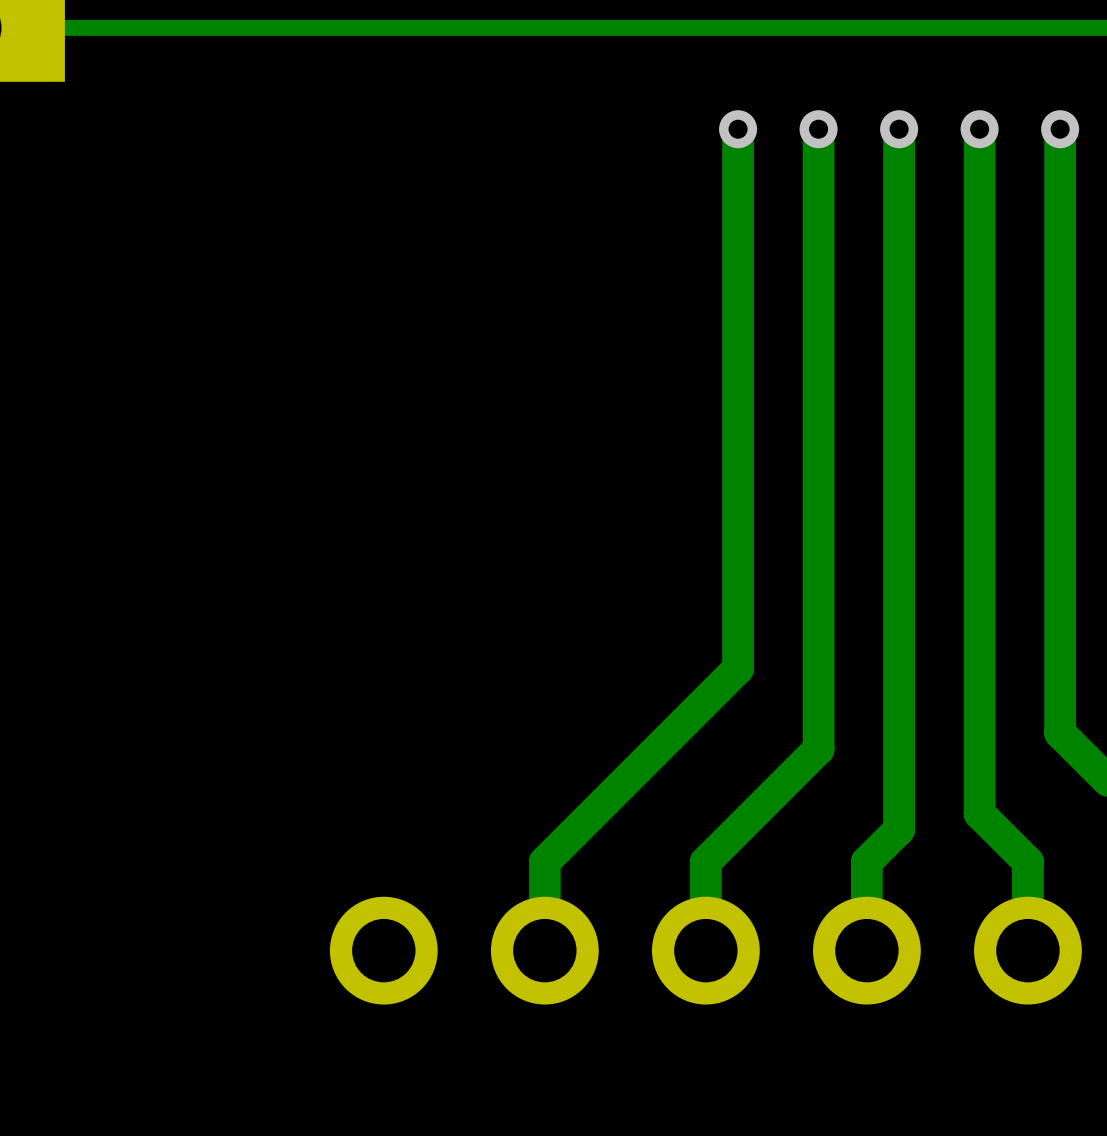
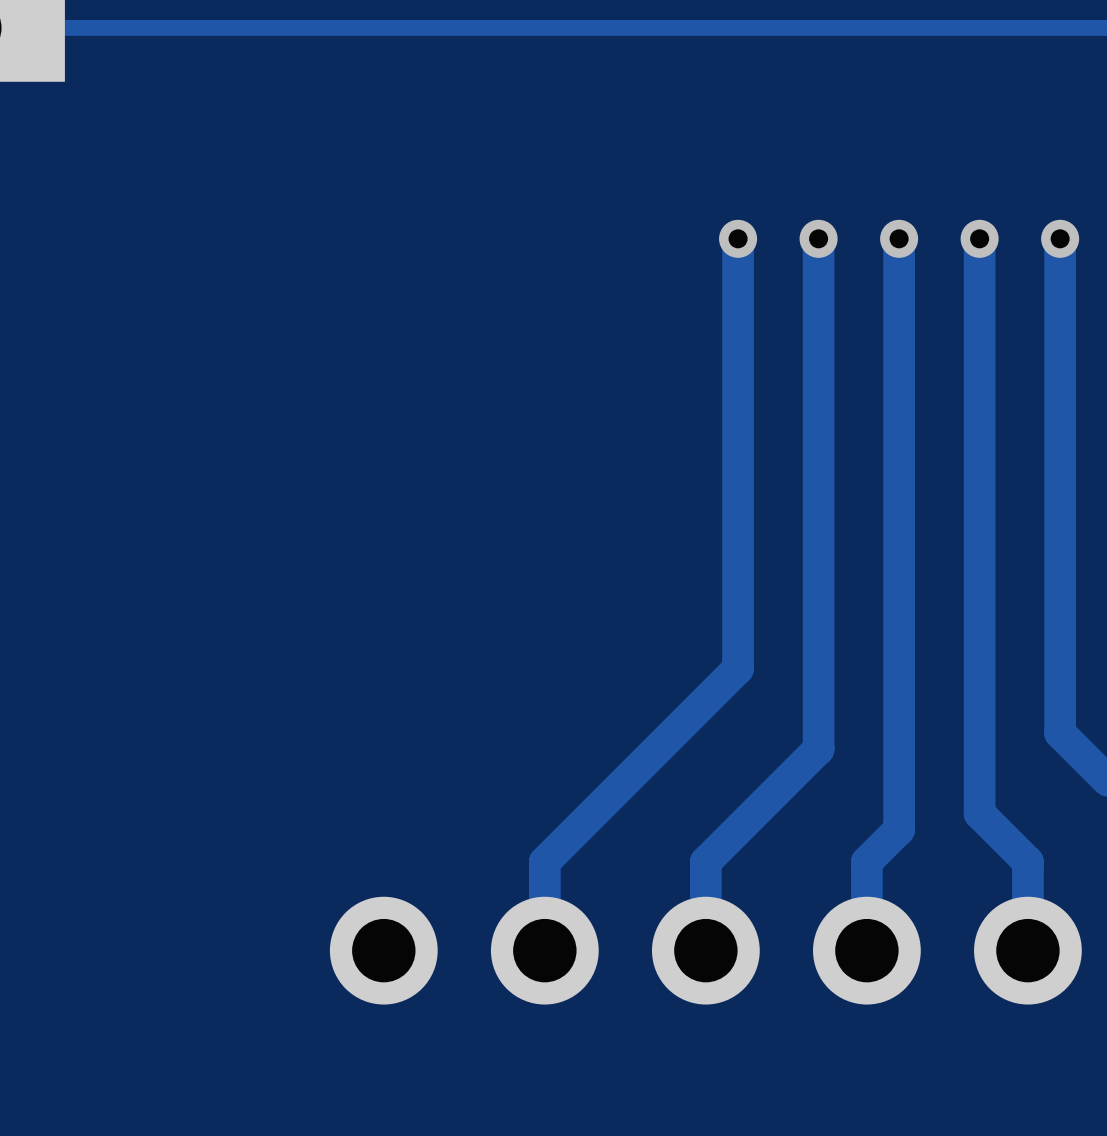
track: (738, 129) (738, 238) -> none
via: (738, 129) -> none
track: (818, 129) (818, 238) -> none
via: (818, 129) -> none
track: (899, 129) (899, 238) -> none
via: (899, 129) -> none
track: (979, 129) (979, 238) -> none
via: (979, 129) -> none
track: (1060, 129) (1060, 238) -> none
via: (1060, 129) -> none
via: none -> (738, 238)
via: none -> (818, 238)
via: none -> (899, 238)
via: none -> (979, 238)
via: none -> (1060, 238)

